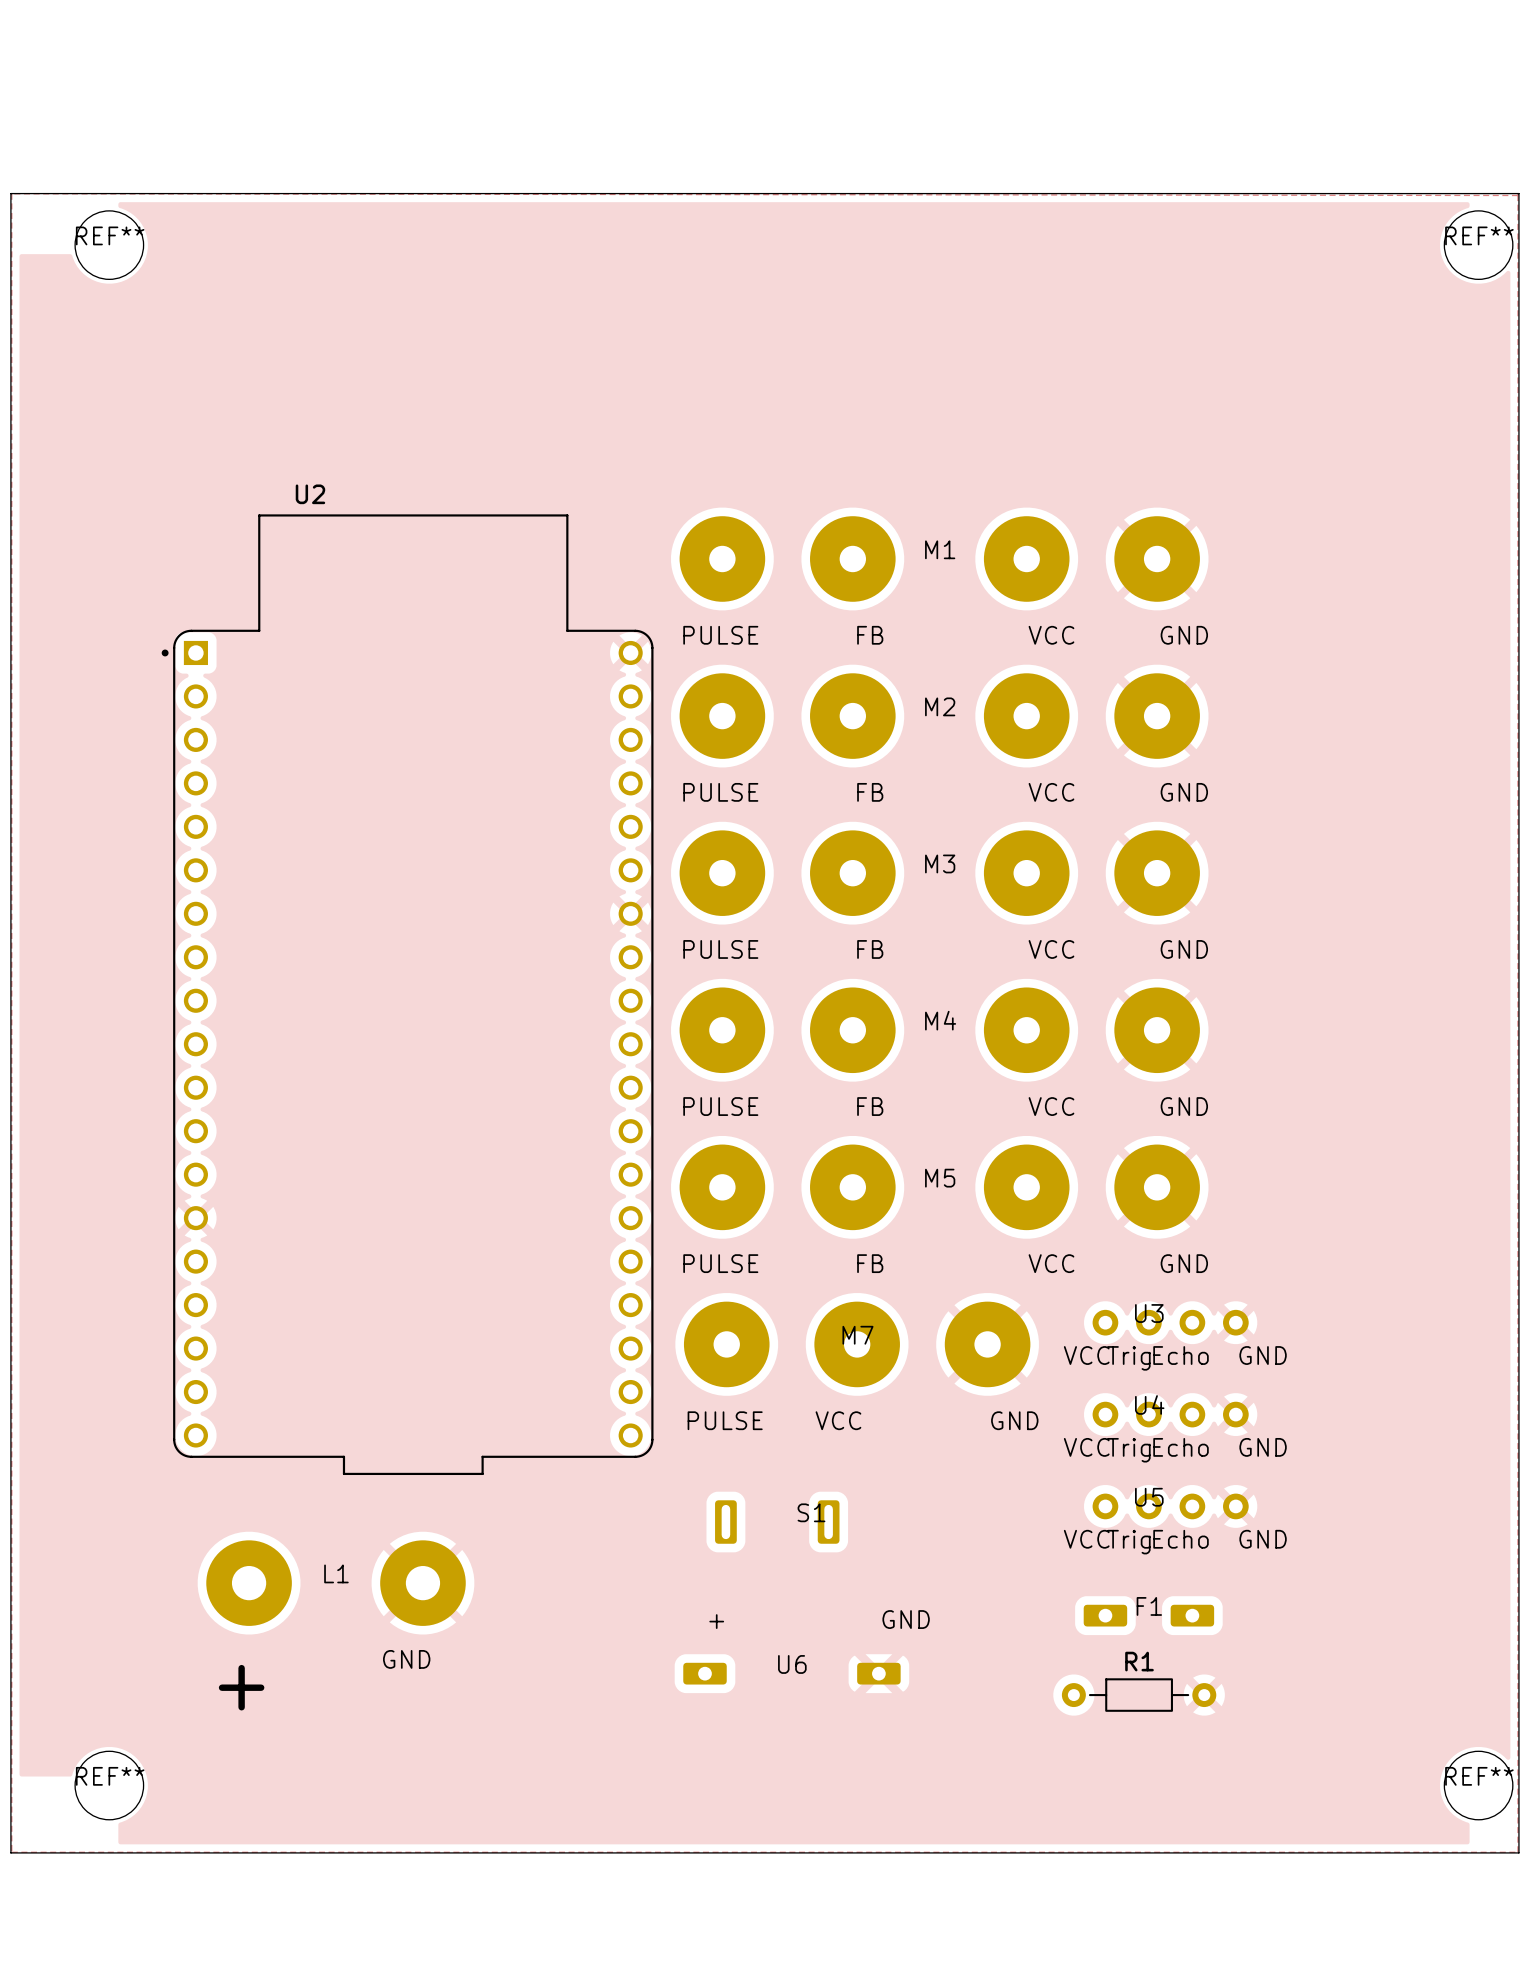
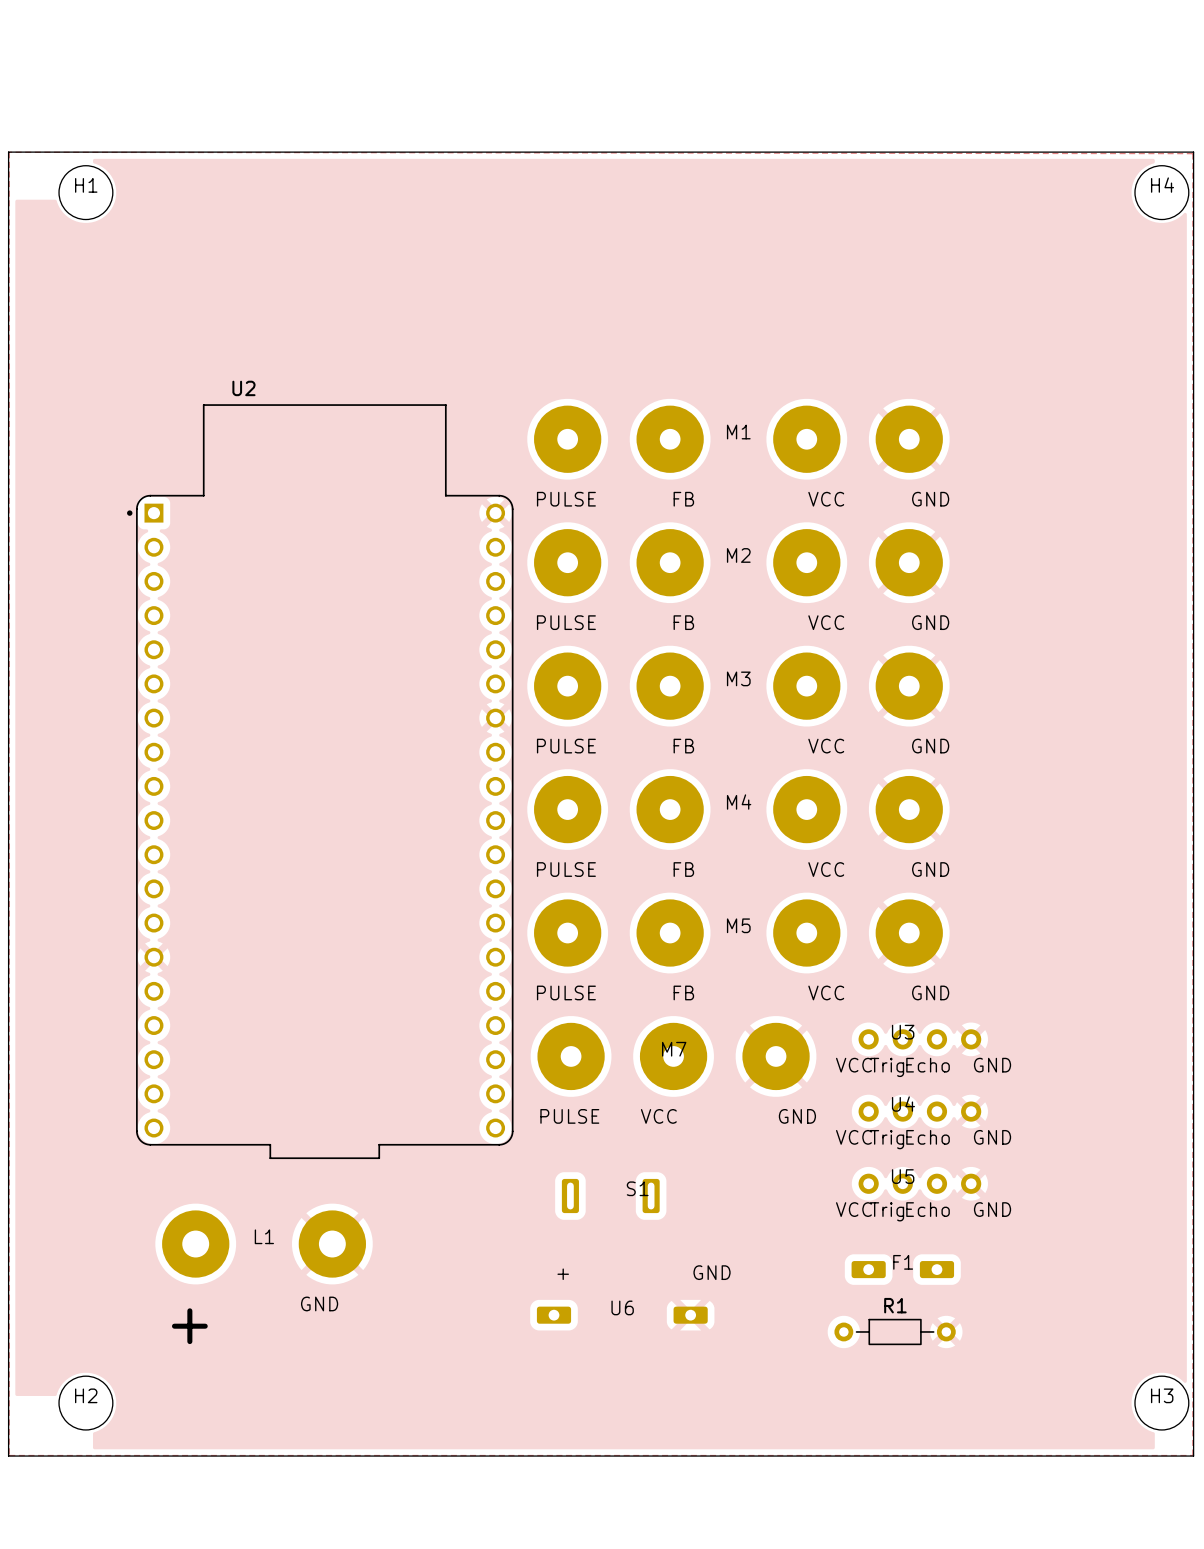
REF** name: REF** (110, 235) -> H1 (86, 185)
REF** name: REF** (1479, 235) -> H4 (1162, 185)
REF** name: REF** (110, 1776) -> H2 (86, 1395)
REF** name: REF** (1479, 1776) -> H3 (1162, 1395)

